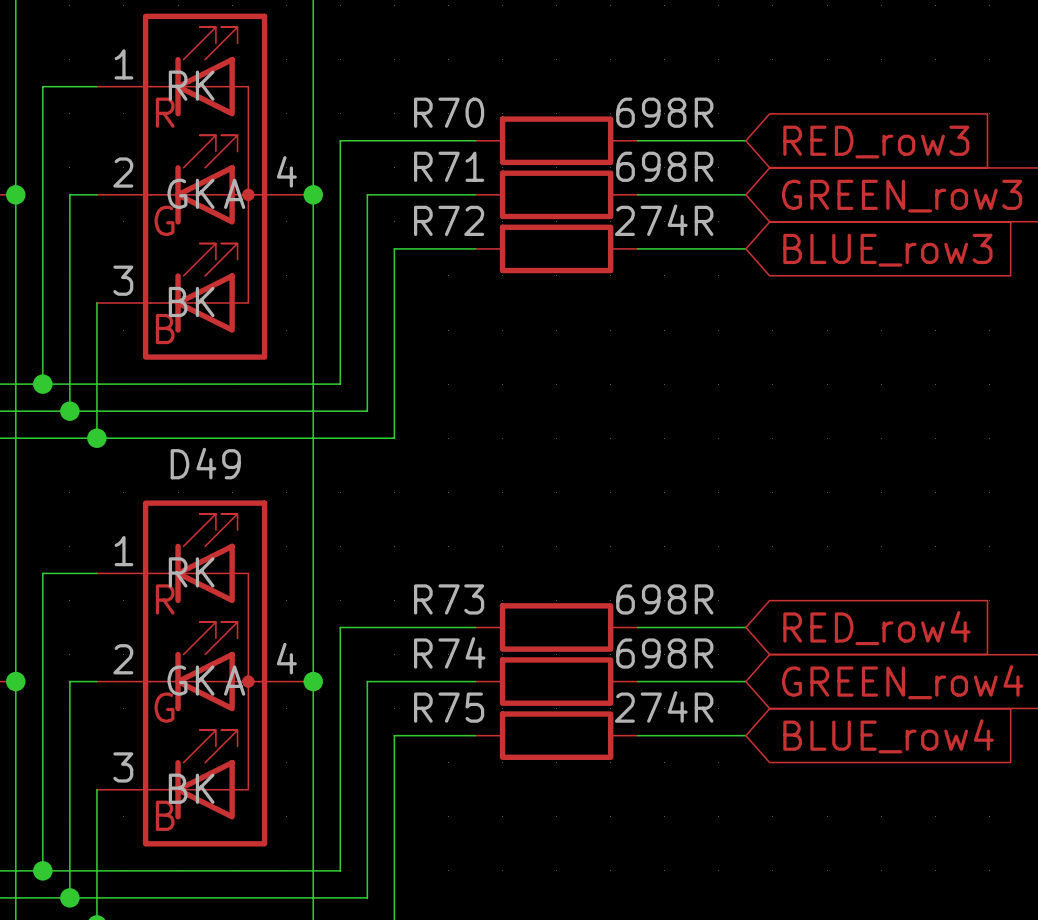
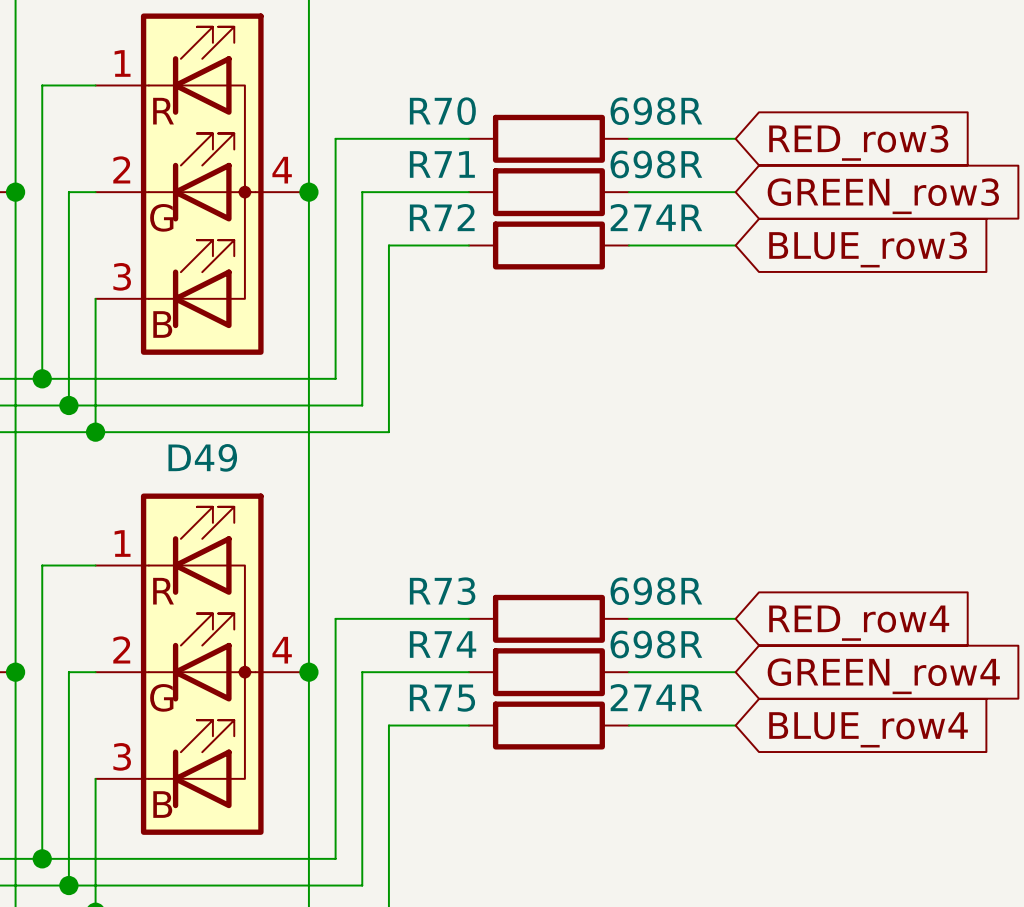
part pin name: RK (191, 85) -> none
part pin name: GK (190, 193) -> none
part pin name: A (234, 193) -> none
part pin name: BK (191, 301) -> none
D49 pin name: RK (191, 572) -> none
D49 pin name: GK (190, 680) -> none
D49 pin name: A (234, 680) -> none
D49 pin name: BK (191, 788) -> none

